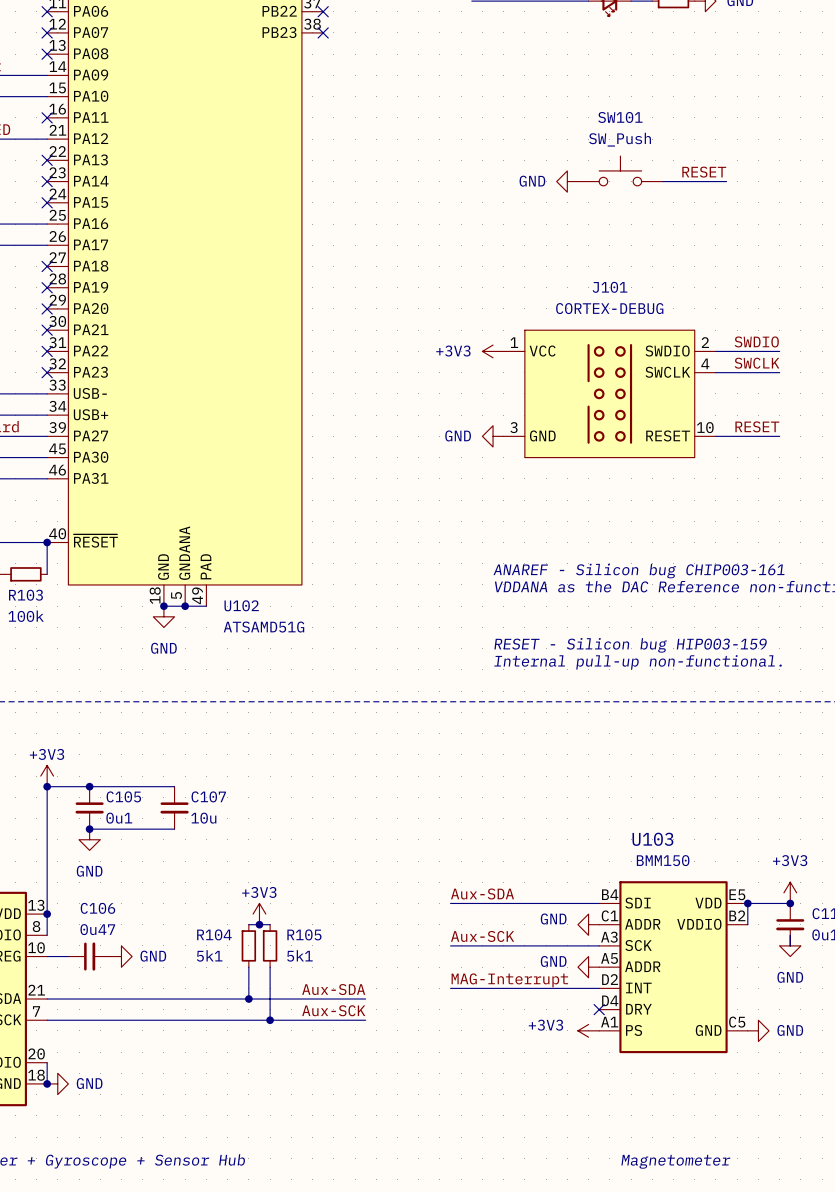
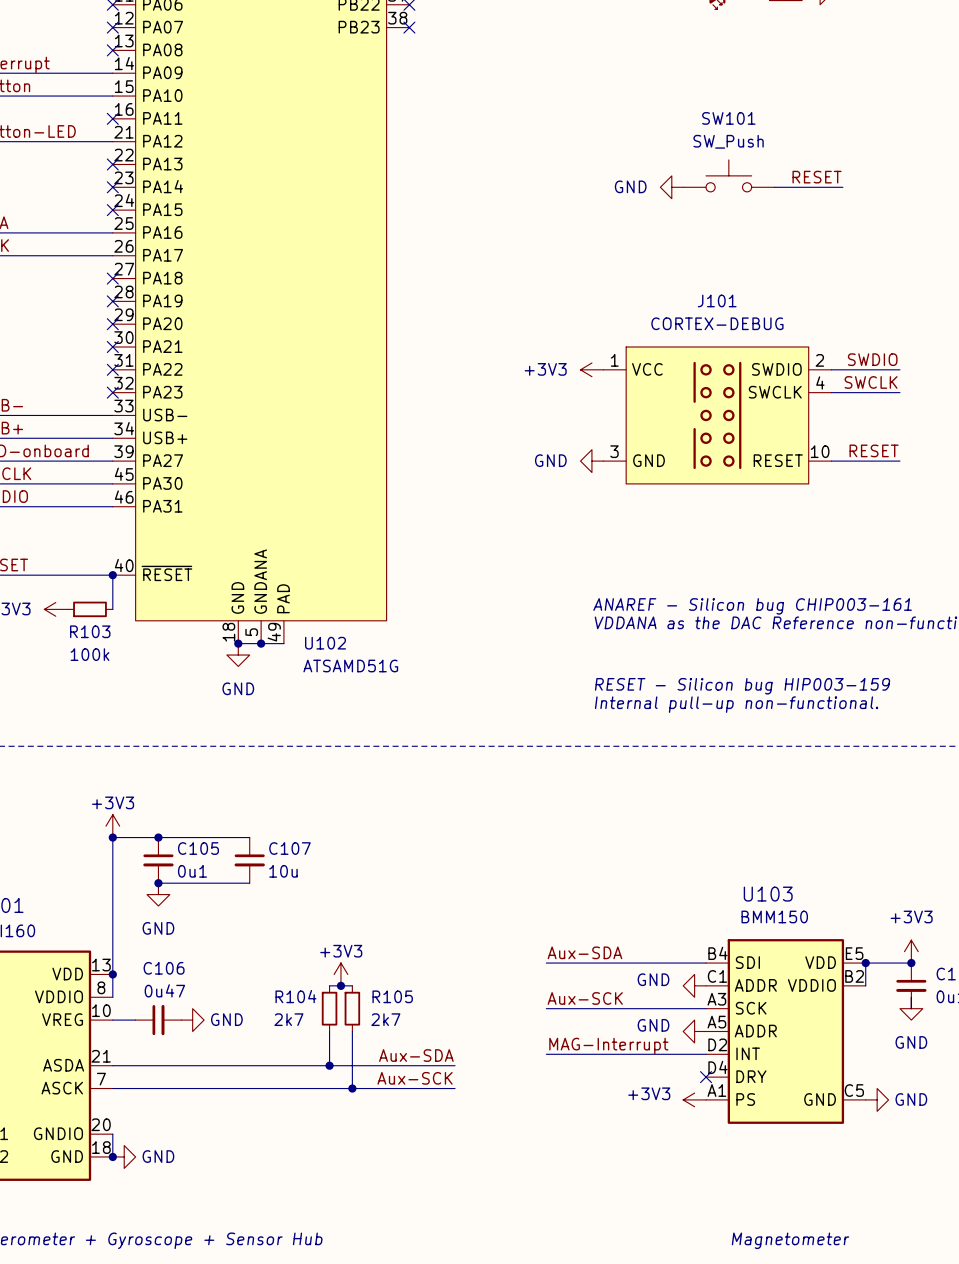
R104 value: 5k1 (209, 955) -> 2k7 (288, 1019)
R105 value: 5k1 (299, 955) -> 2k7 (385, 1019)

